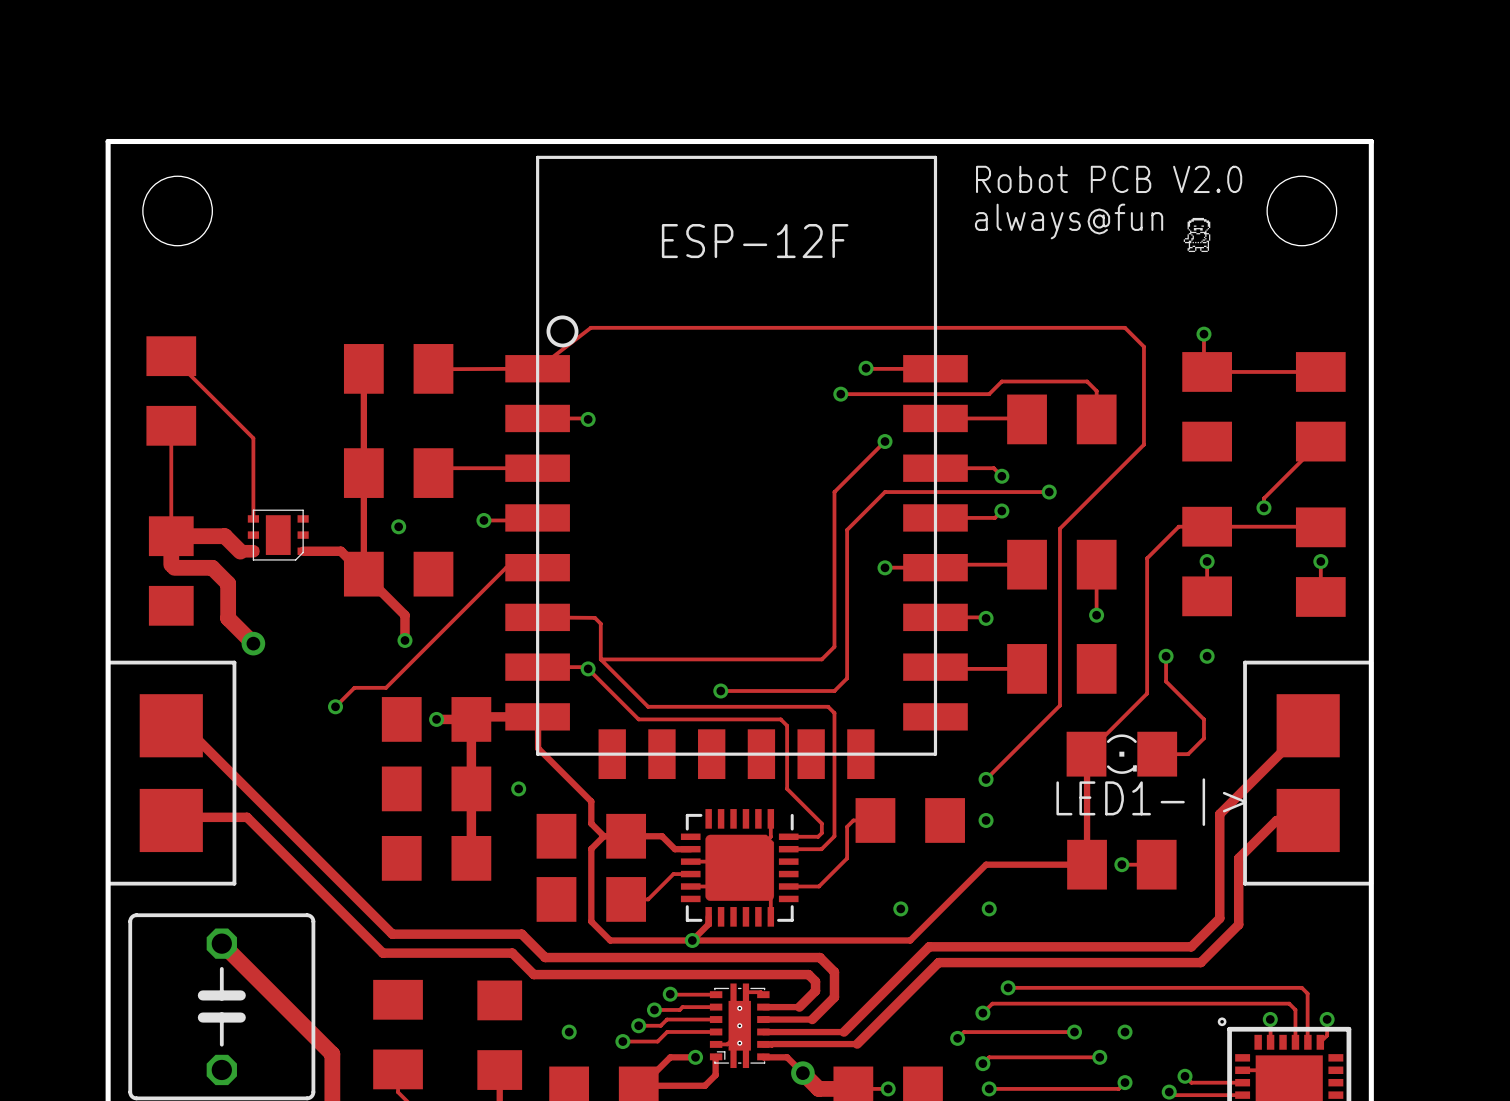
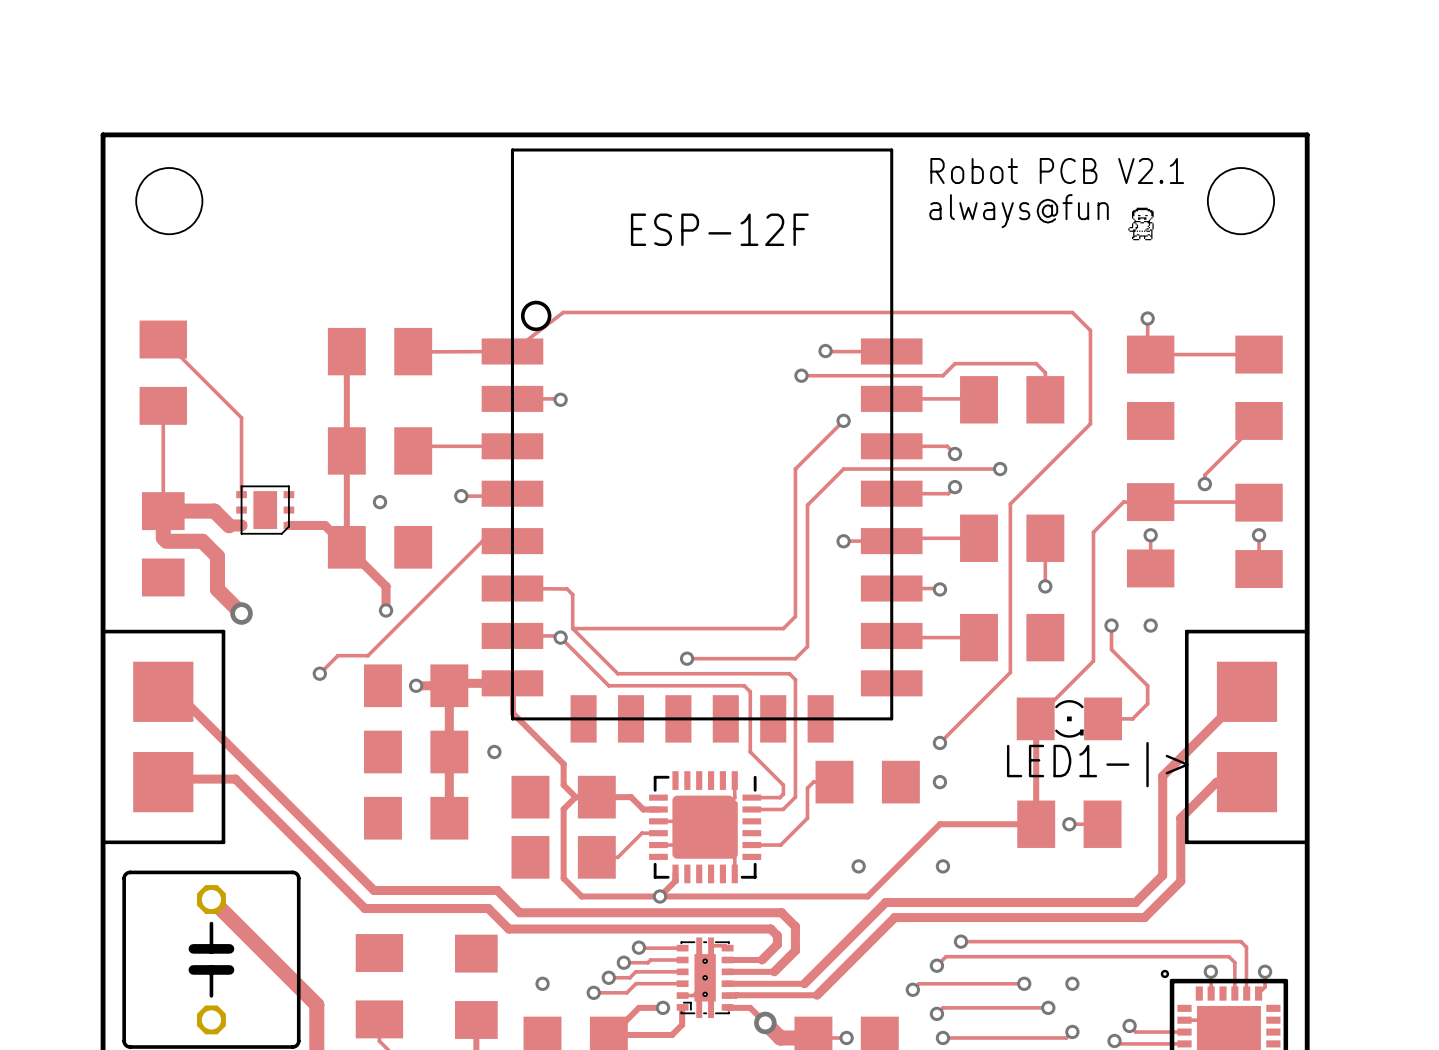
text: Robot PCB V2.0 (1109, 179) -> Robot PCB V2.1 (1057, 171)

